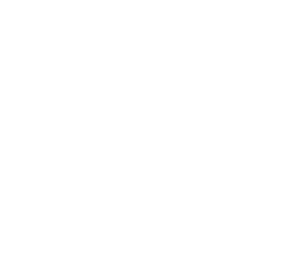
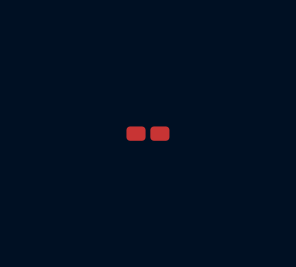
part: none -> (147, 133)

